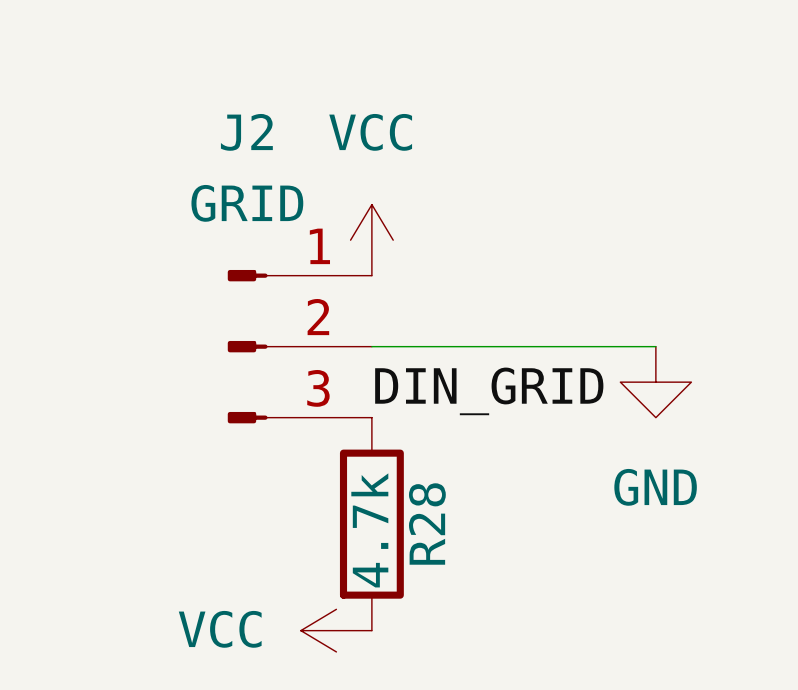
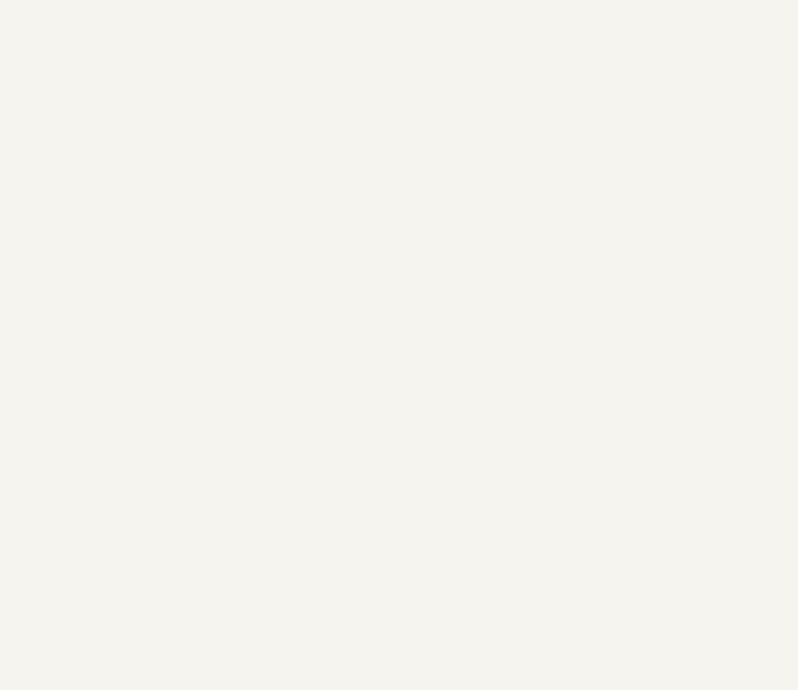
power symbol: VCC (371, 240) -> none
J2: GRID (299, 346) -> none
wire: (371, 346) (655, 346) -> none
power symbol: GND (655, 382) -> none
label: DIN_GRID (489, 391) -> none
R28: 4.7k (371, 524) -> none
power symbol: VCC (336, 630) -> none

